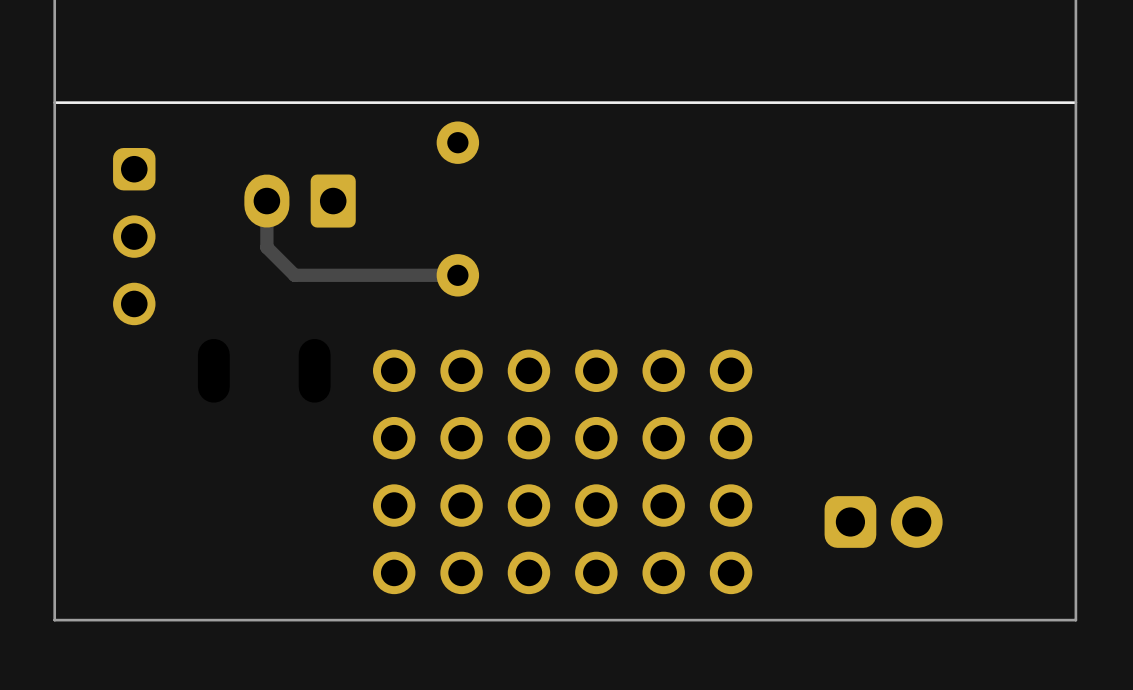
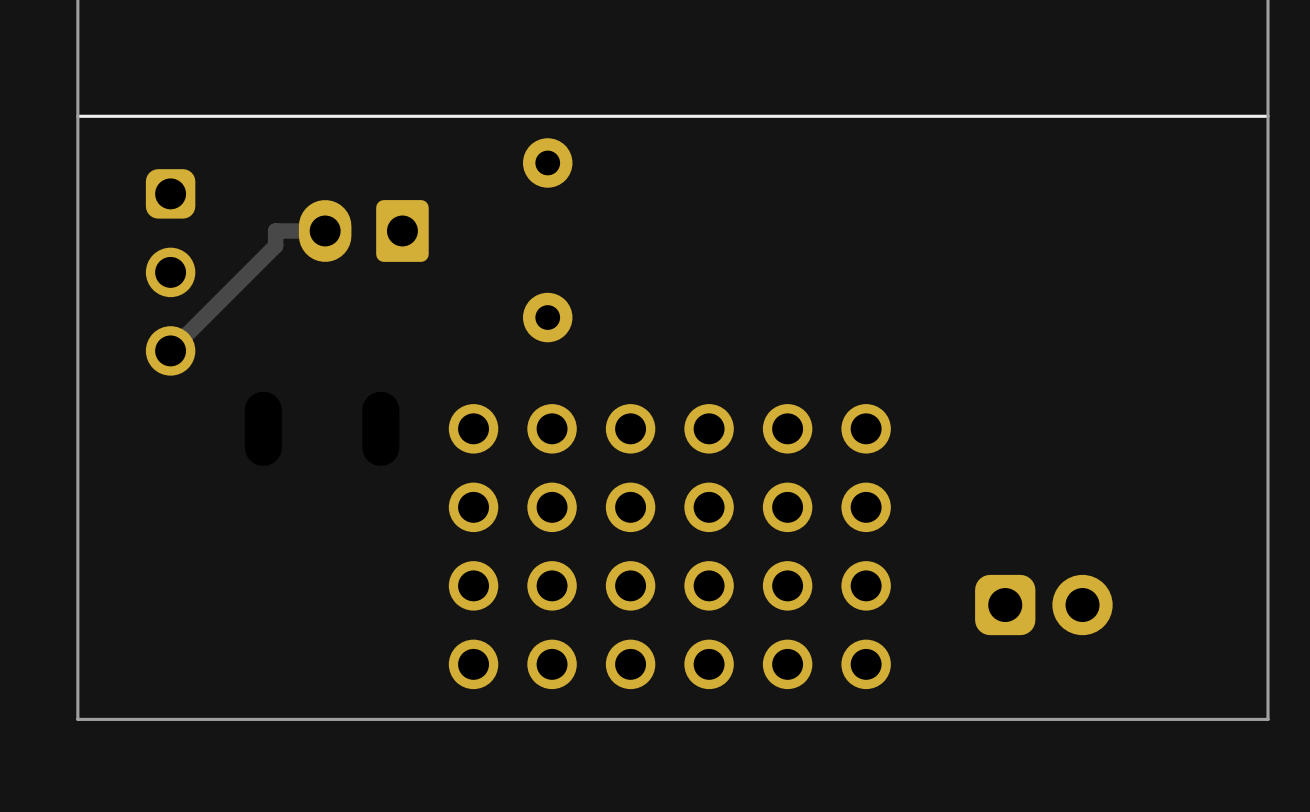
track: (266, 201) (266, 247) (294, 275) (457, 275) -> (325, 230) (275, 230) (275, 245) (170, 350)

